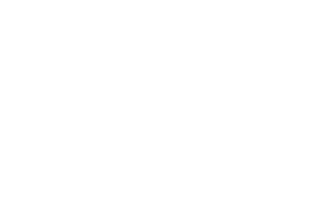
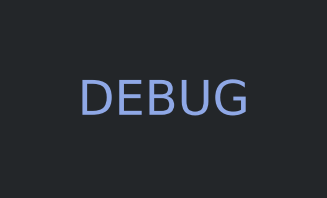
text: none -> DEBUG (164, 97)

